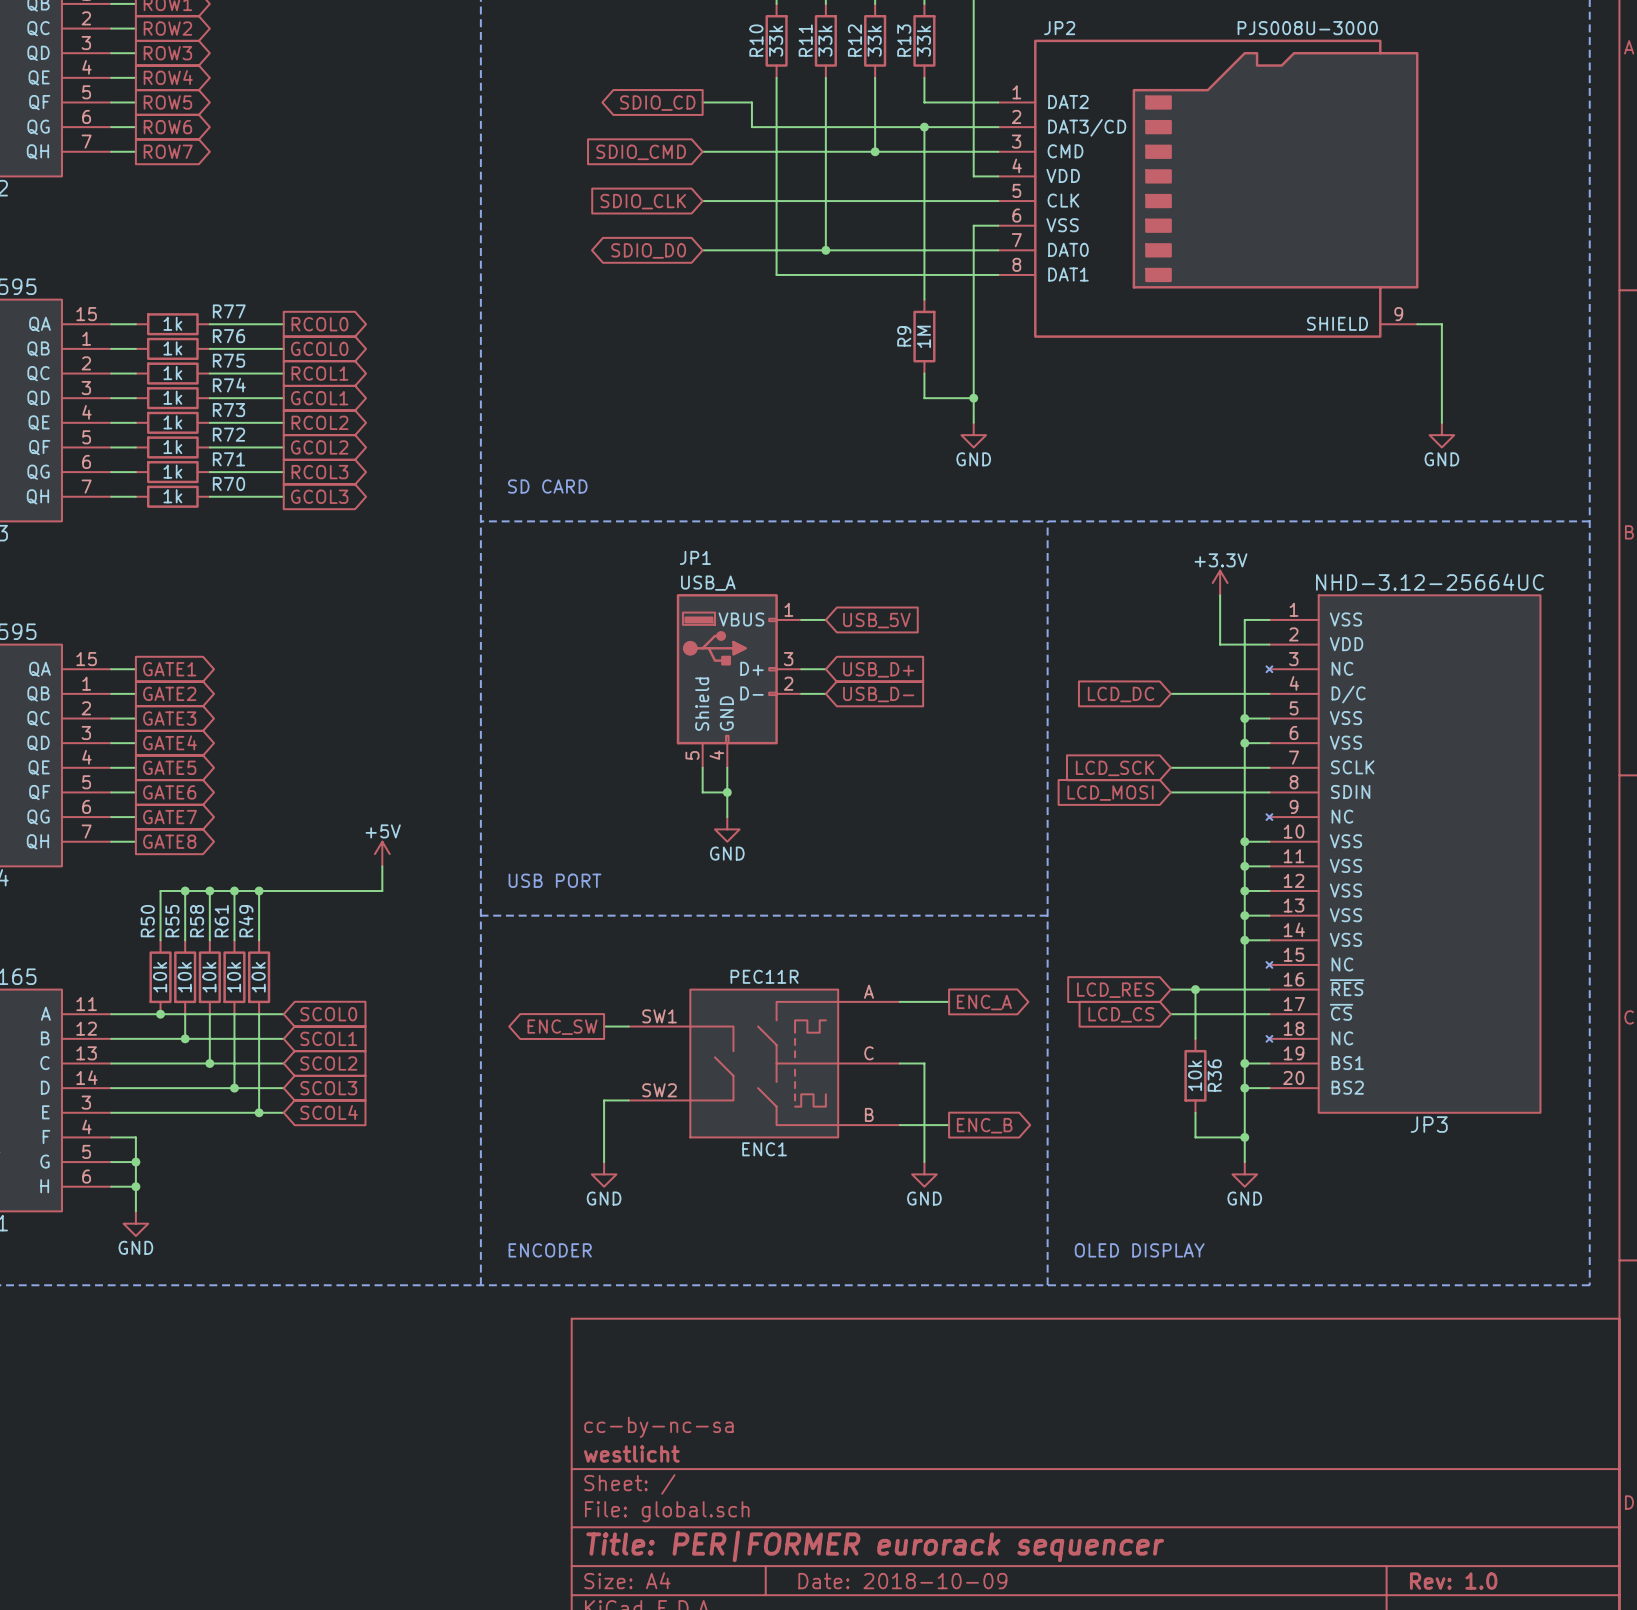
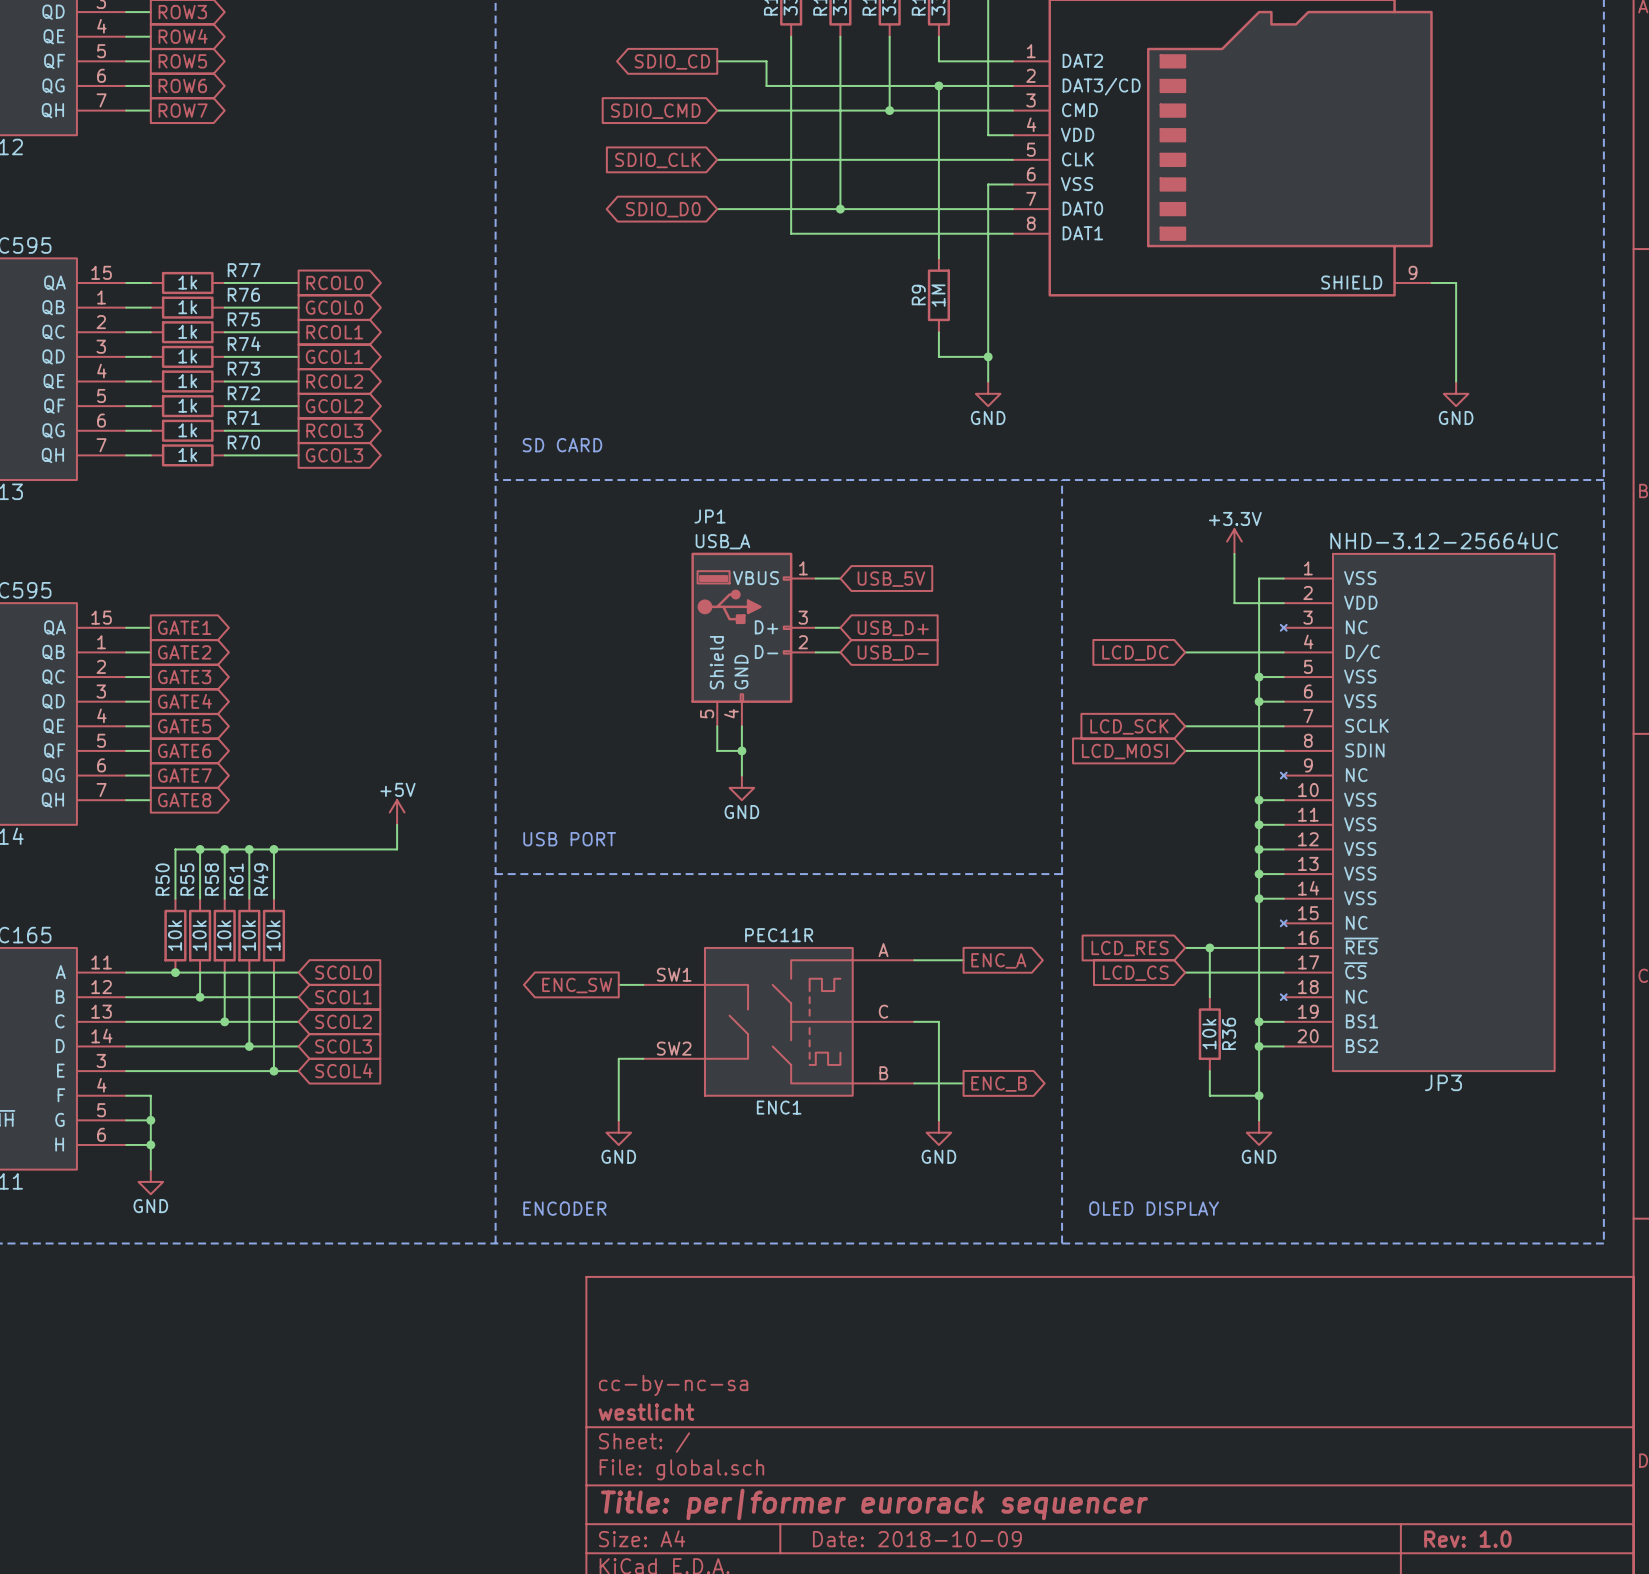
title block: Title: PER|FORMER eurorack sequencer (875, 1546) -> Title: per|former eurorack sequencer (874, 1504)

